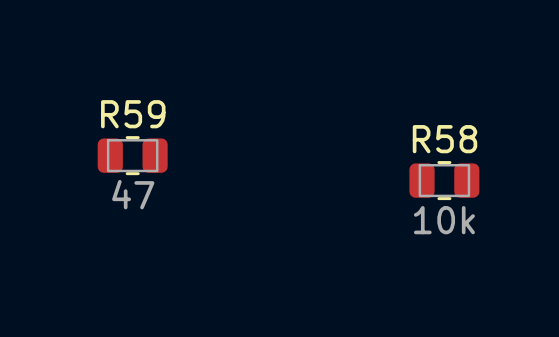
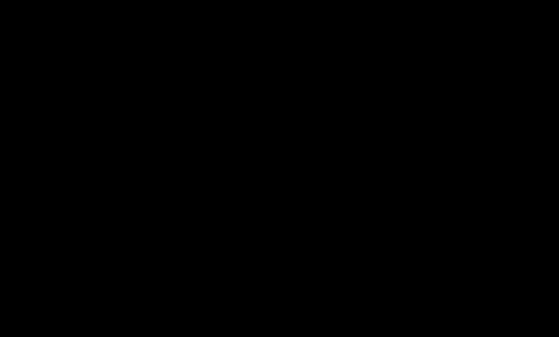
R59: 47 (132, 155) -> none
R58: 10k (444, 180) -> none

